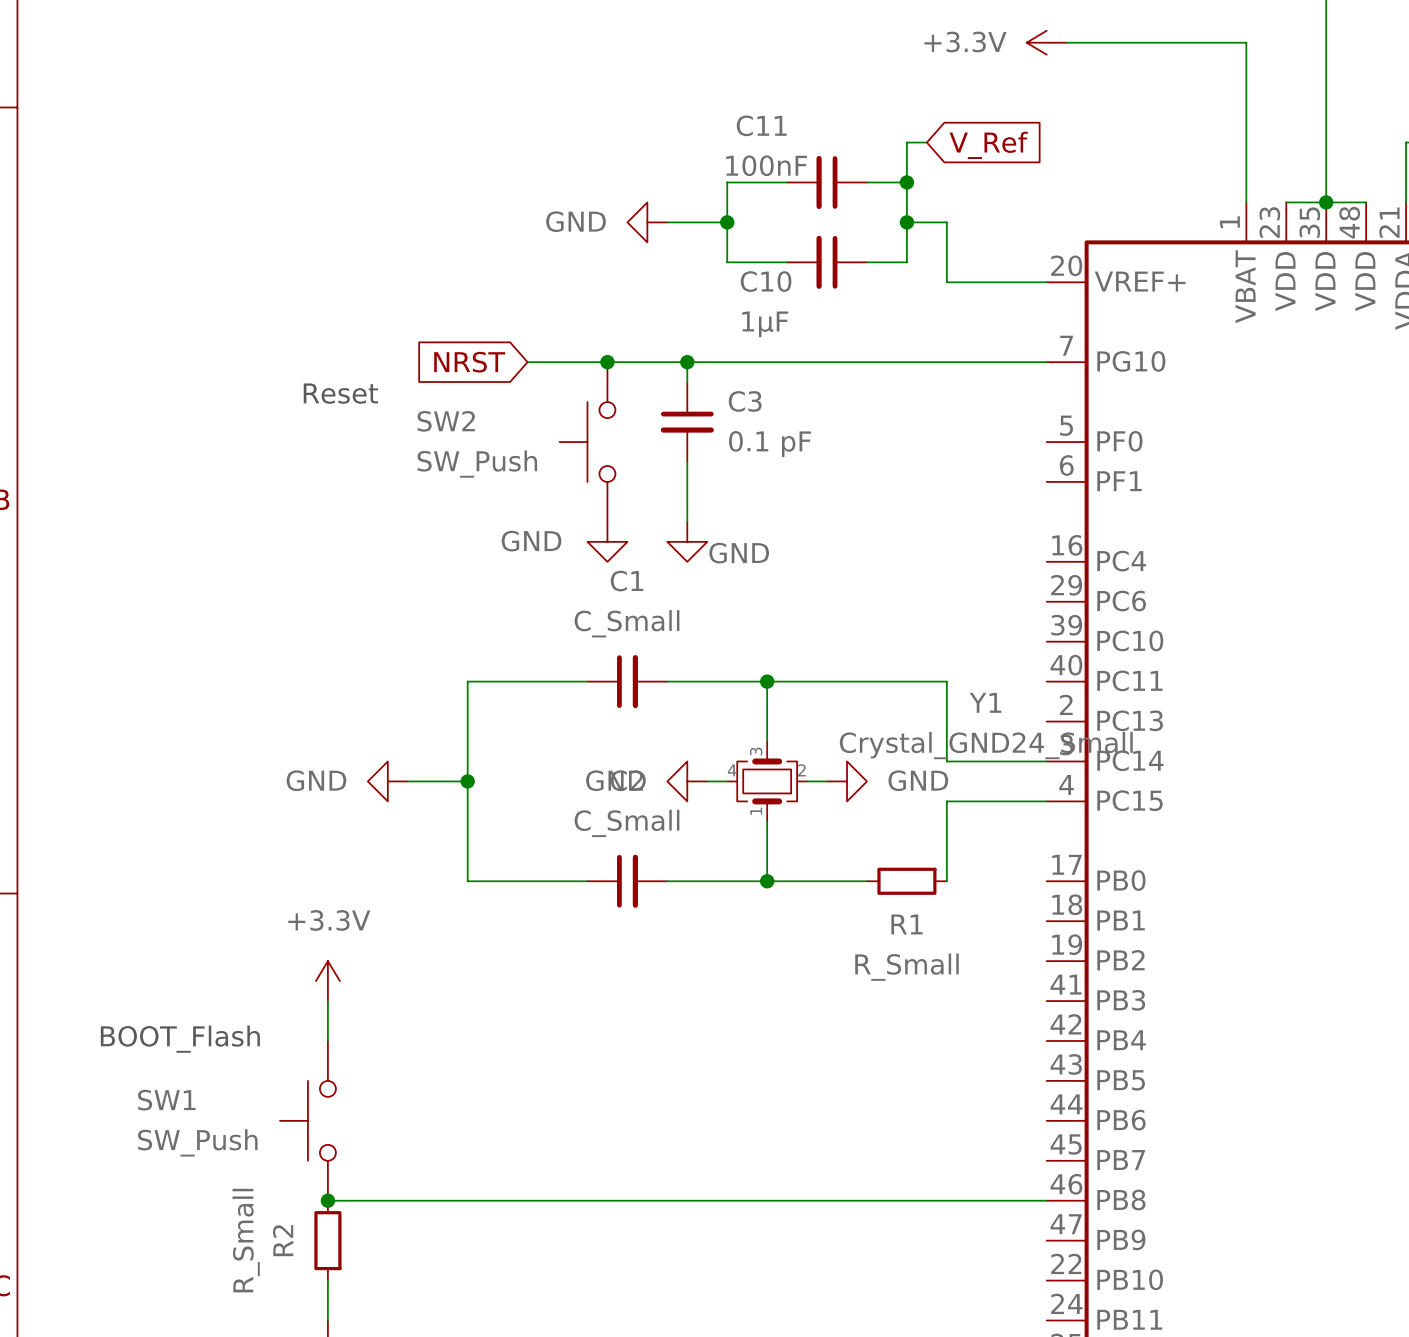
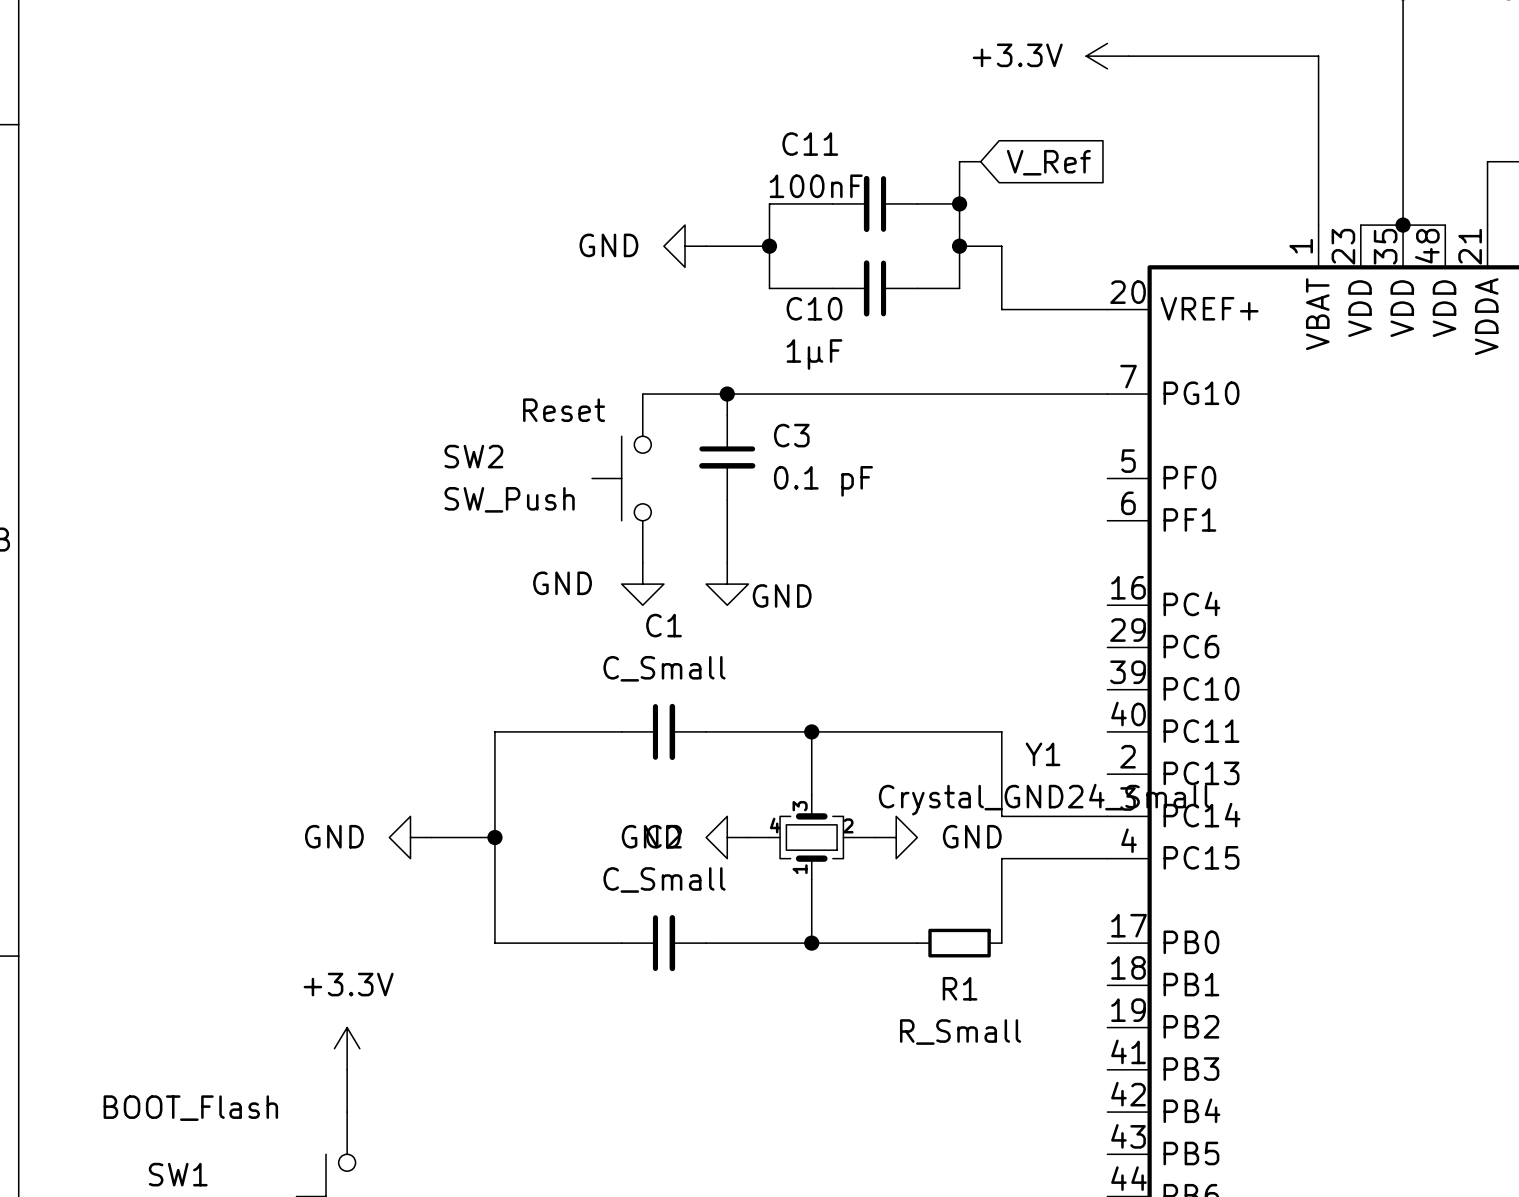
global label: NRST (469, 362) -> none
wire: (527, 362) (607, 362) -> none
junction: (607, 362) -> none
text position: Reset (340, 393) -> Reset (564, 410)

